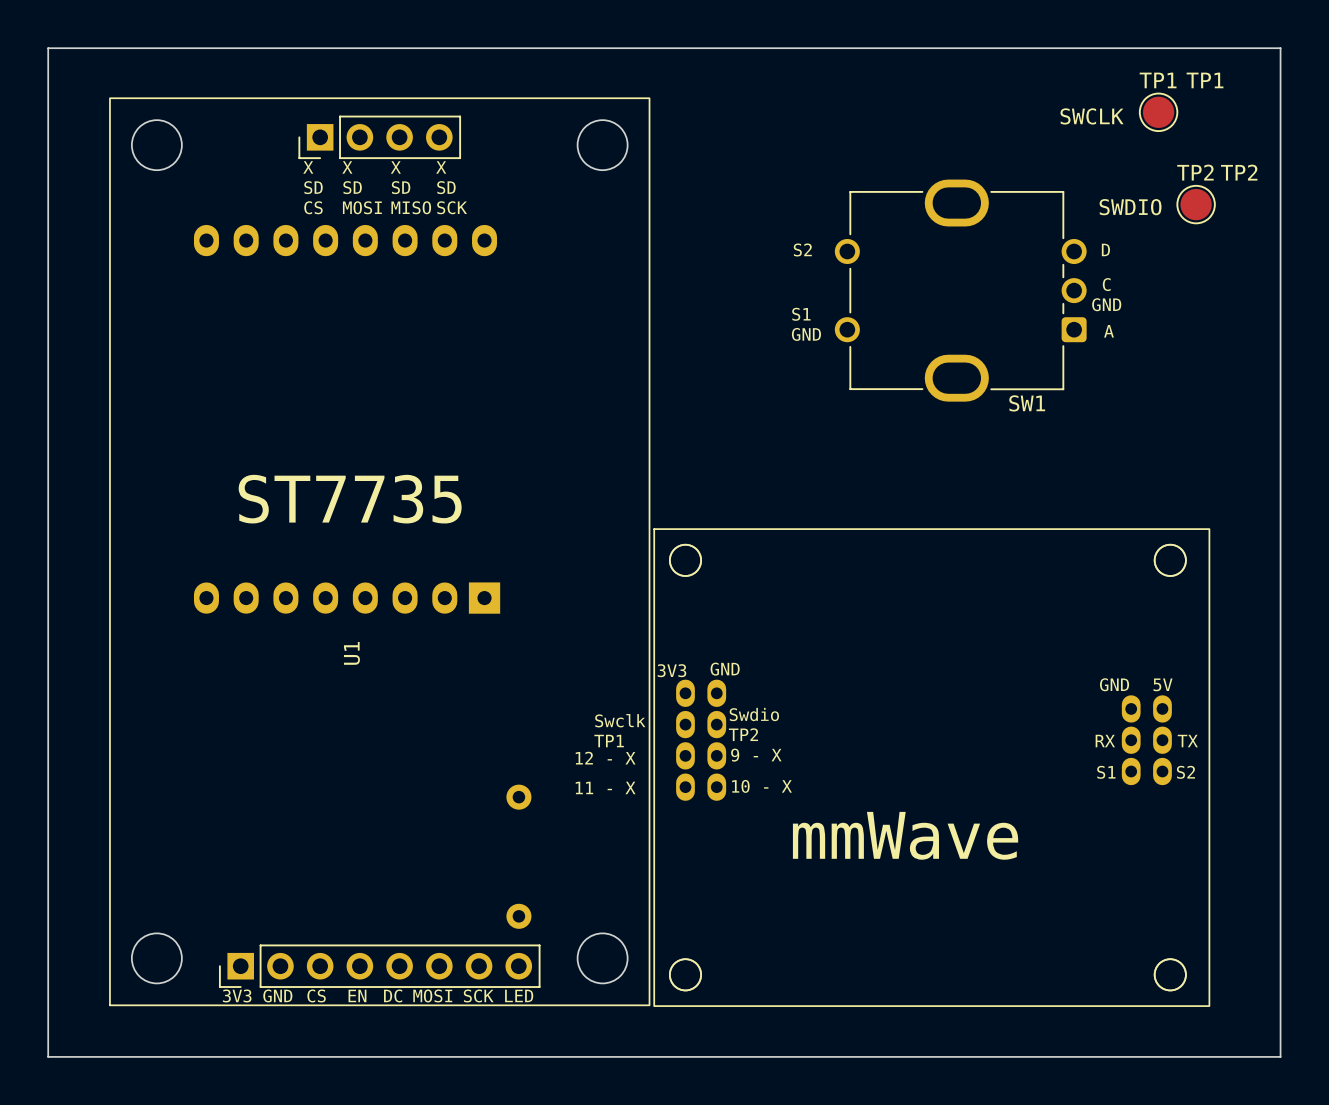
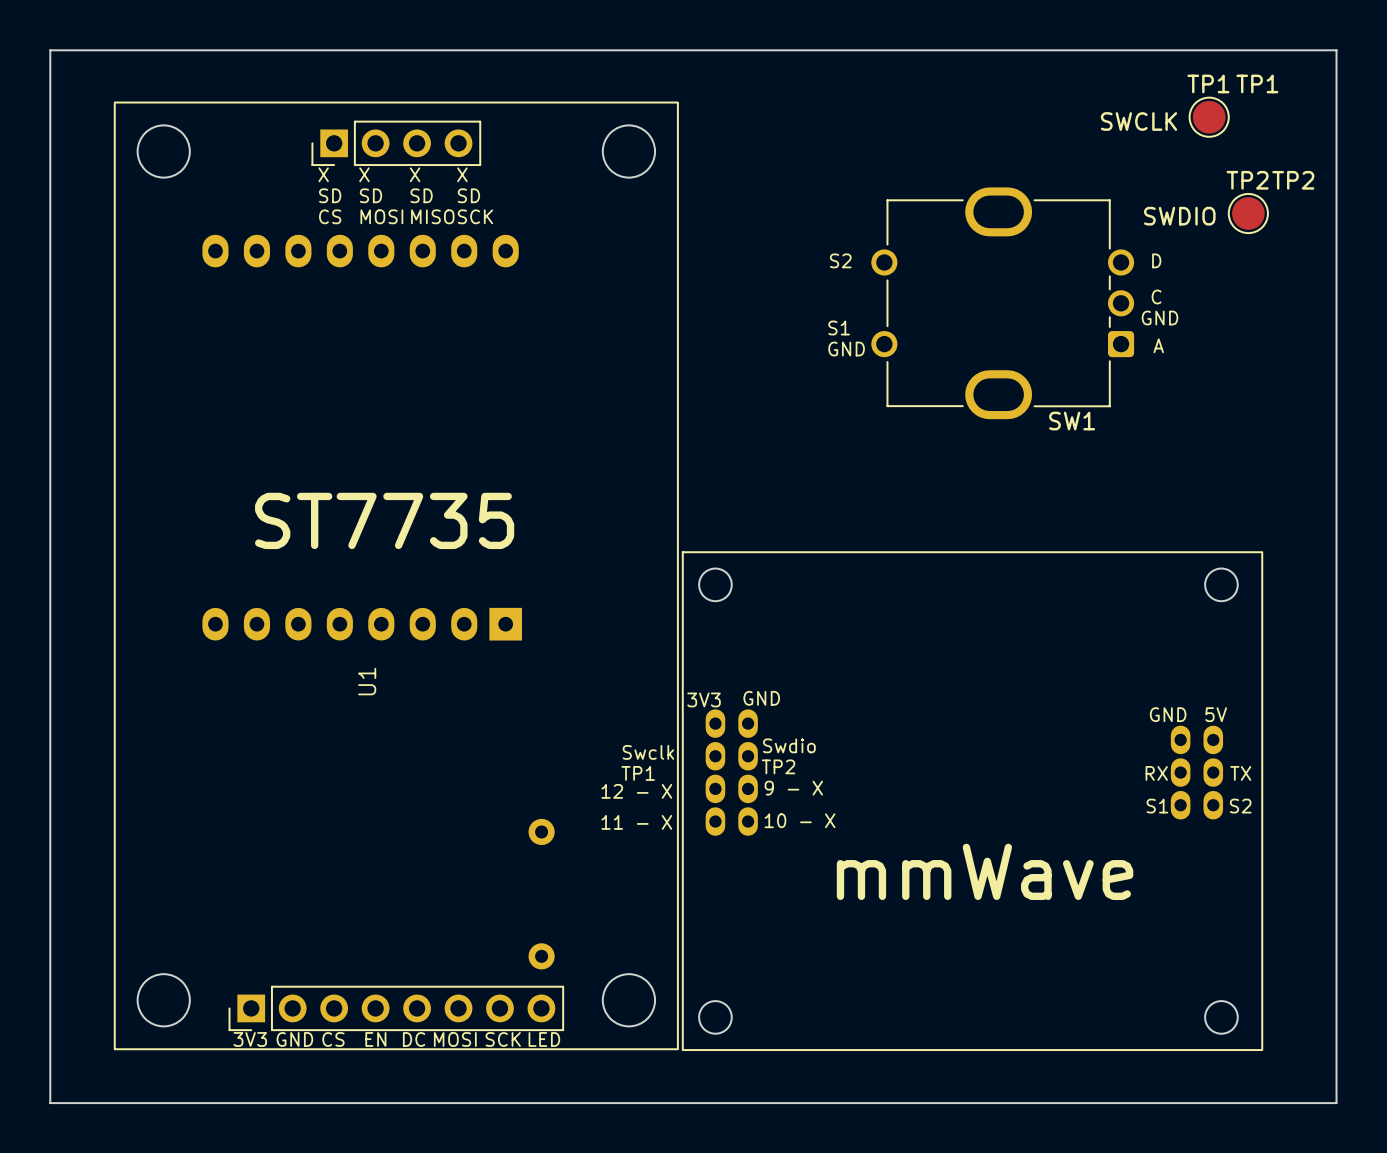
part footprint: [653, 528, 1211, 1007] -> [681, 551, 1264, 1051]

